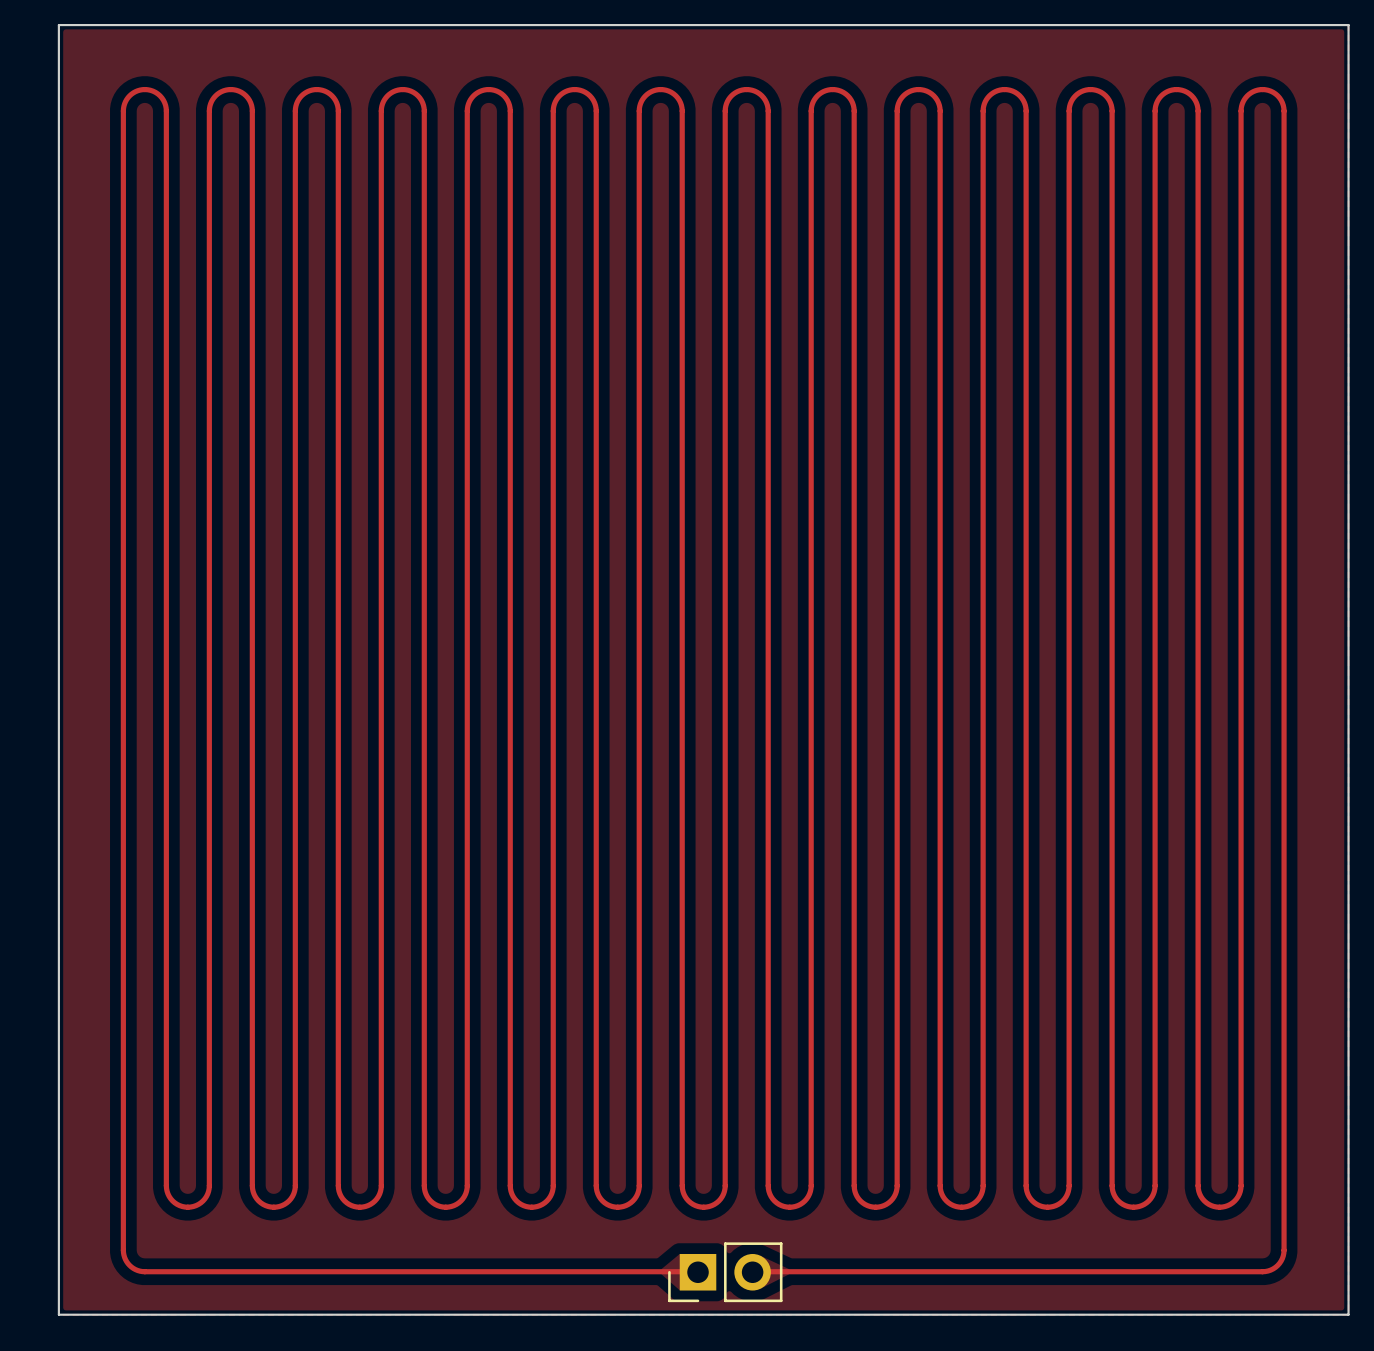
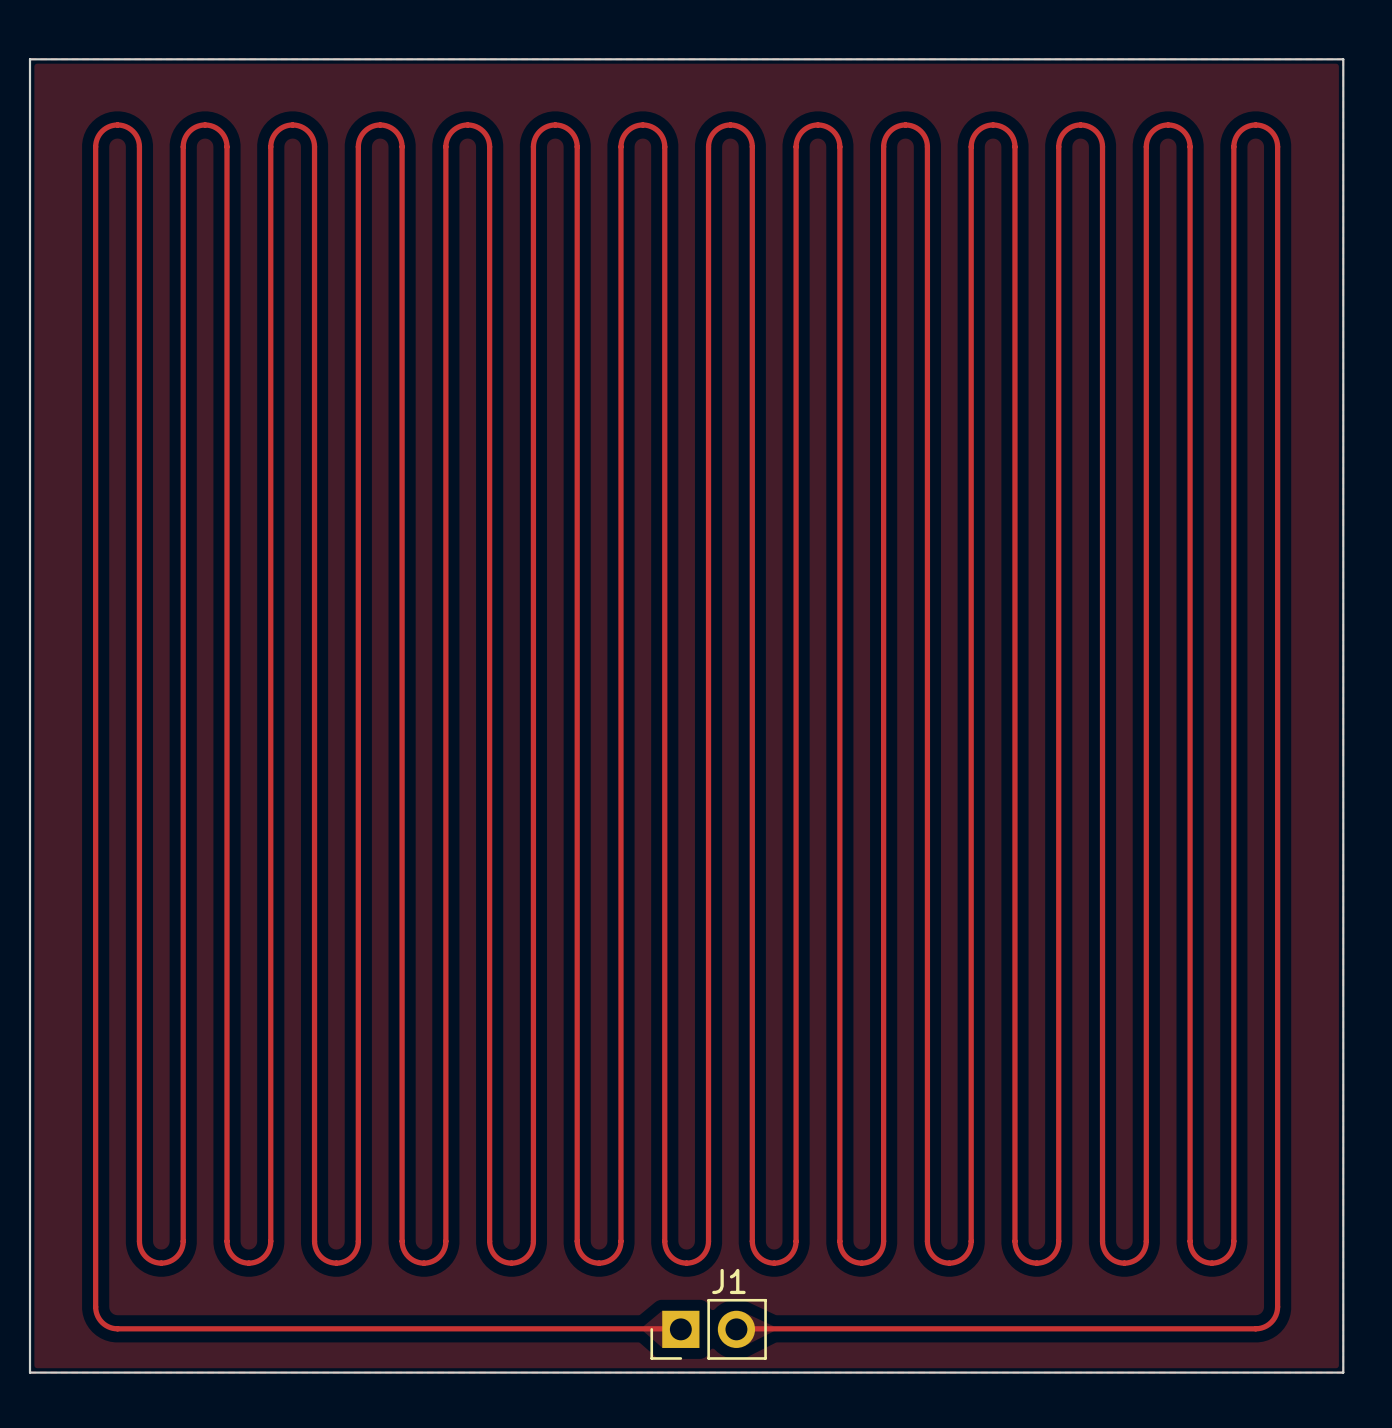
J1 name: none -> J1 (728, 1281)

